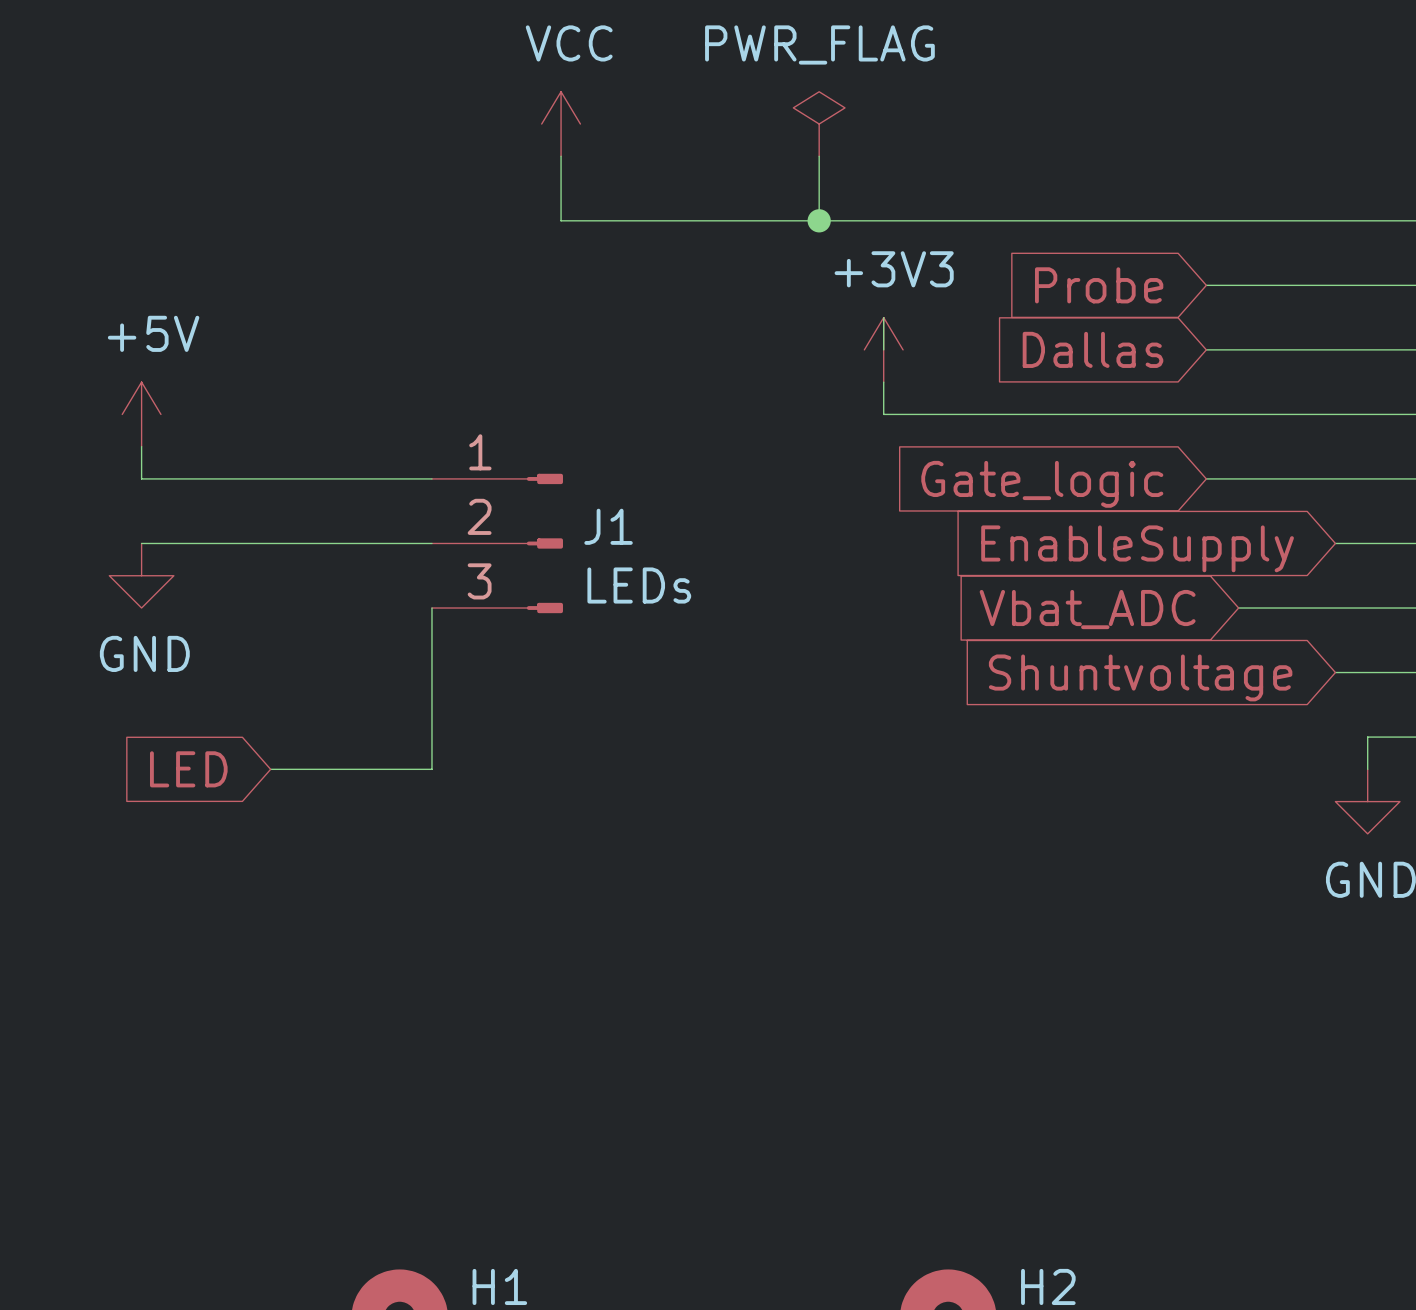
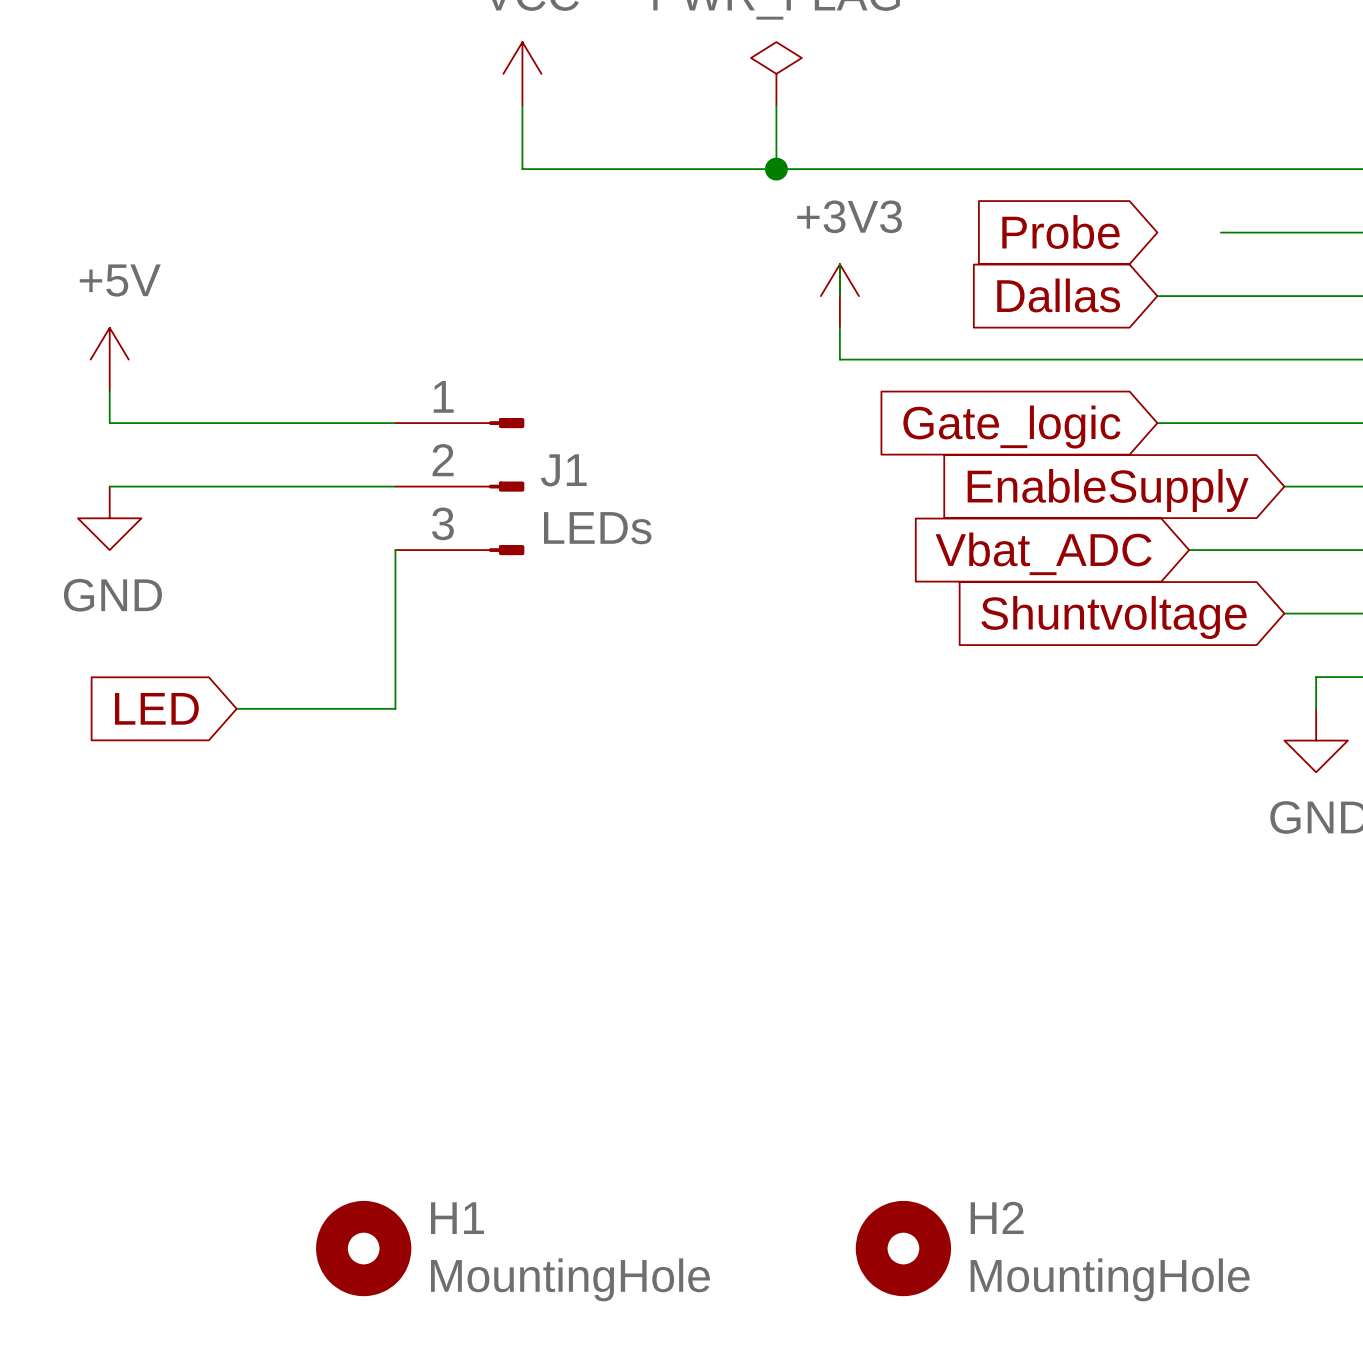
wire: (1206, 285) (1270, 285) -> none

